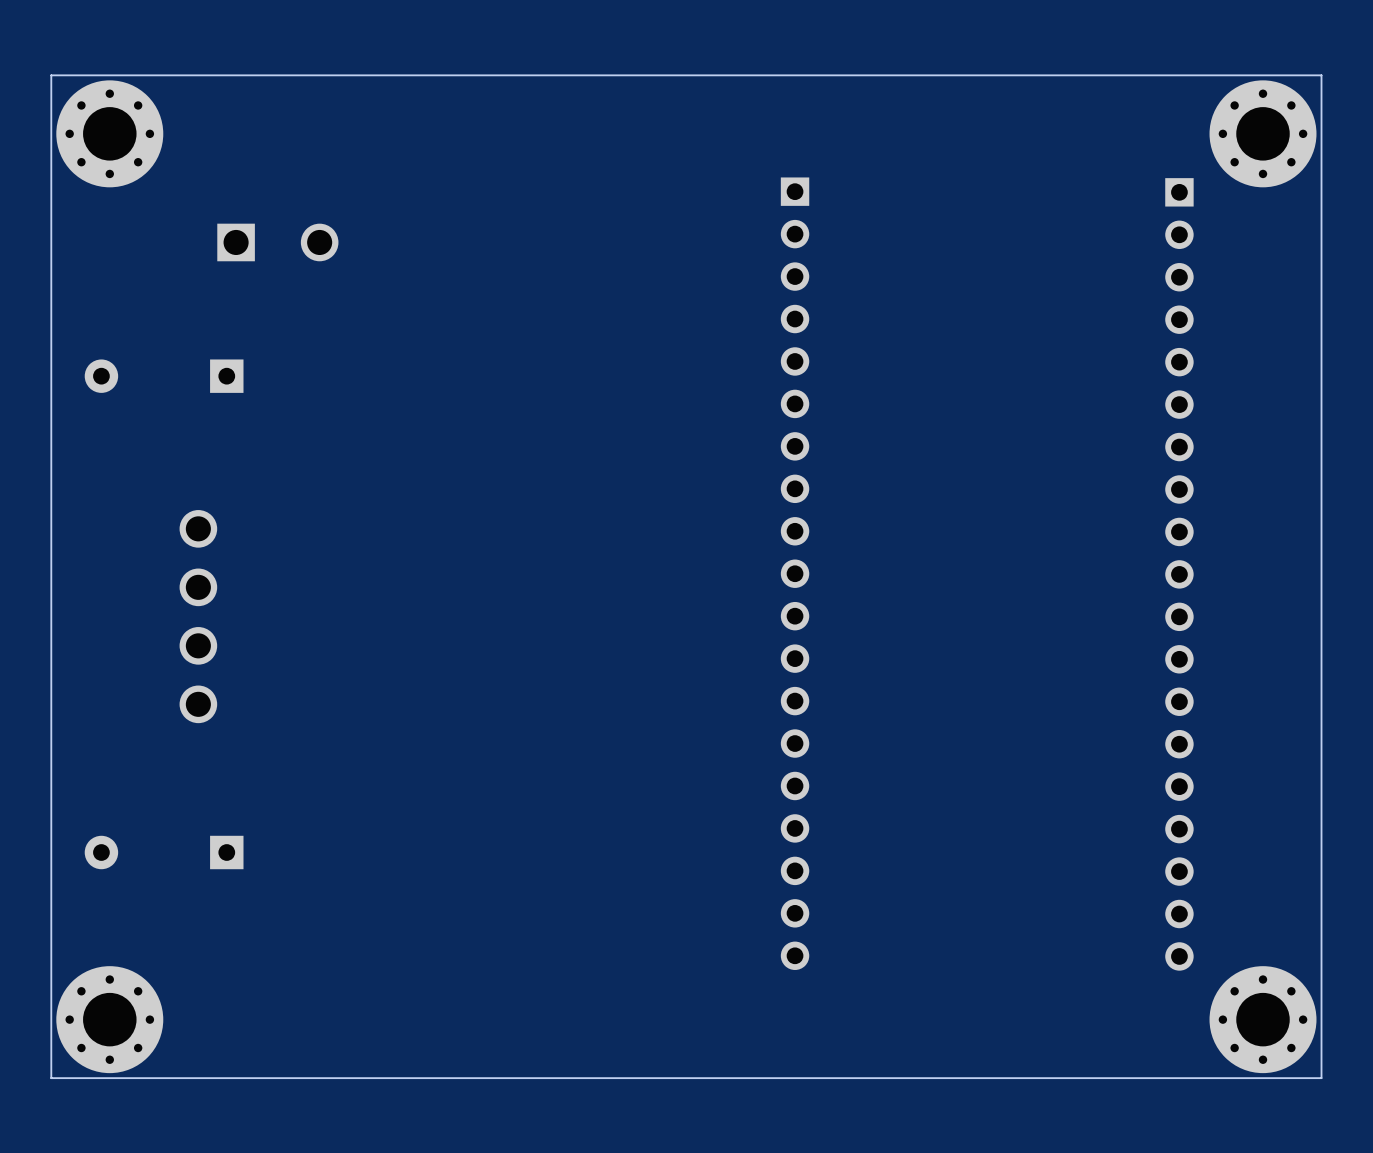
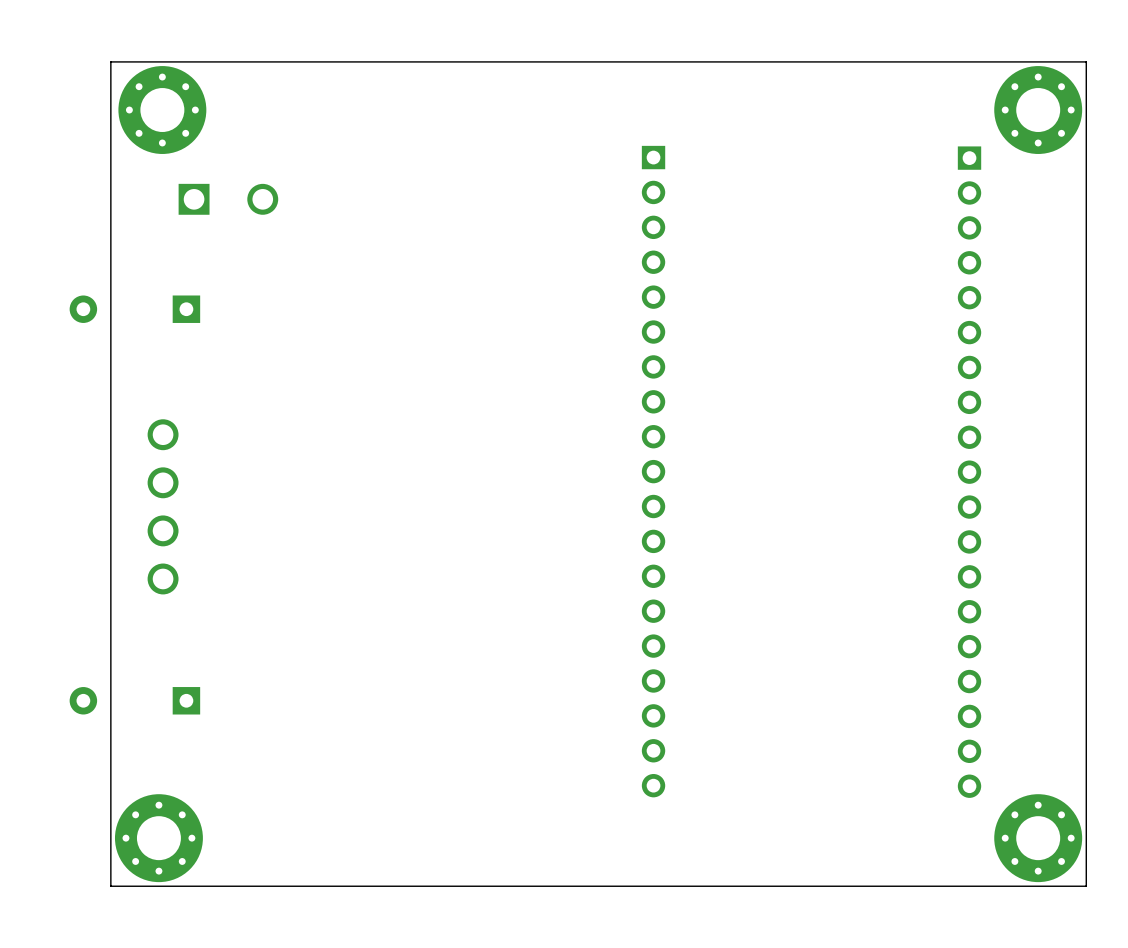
board edge: (134, 75) (51, 75) (51, 1078) (134, 1078) -> (110, 61) (110, 886)
part position: (109, 133) -> (162, 110)
part position: (109, 1019) -> (158, 838)

